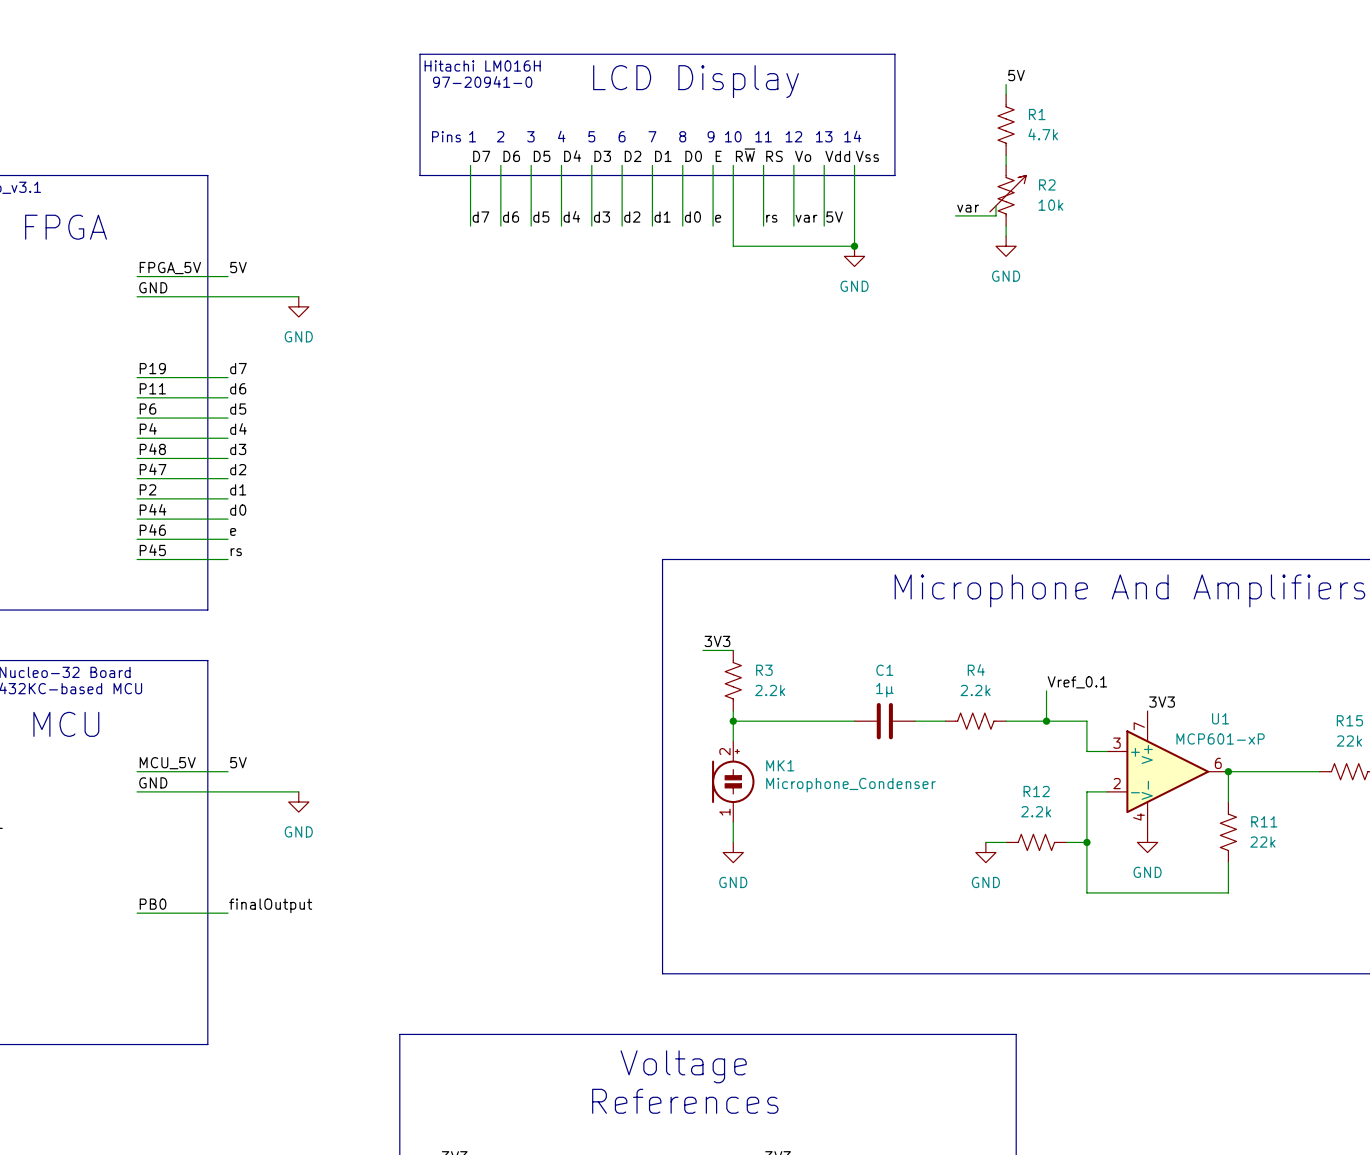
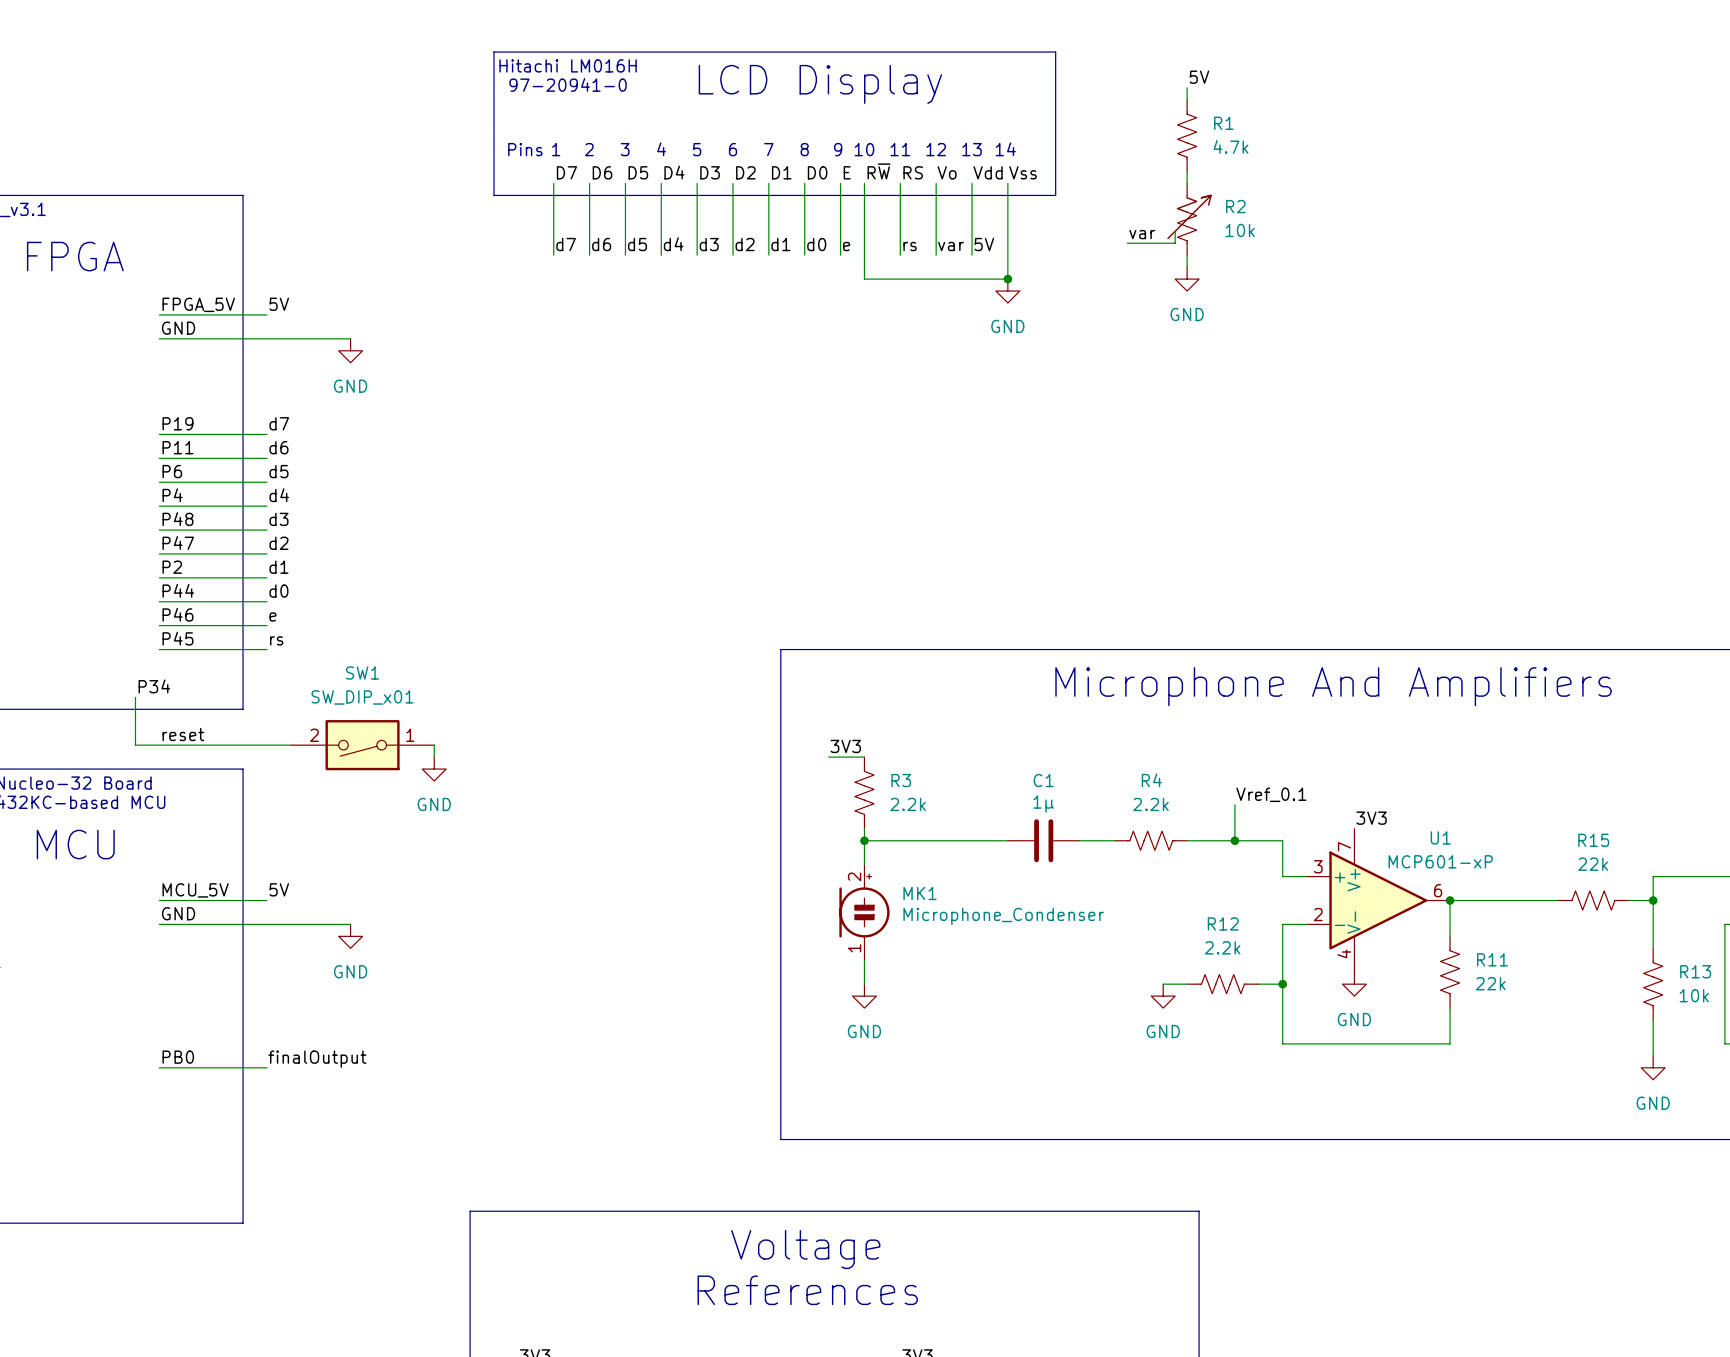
label: none -> P34 (154, 686)
wire: none -> (135, 697) (135, 745) (290, 745)
label: none -> reset (183, 734)
SW1: none -> SW_DIP_x01 (362, 745)
wire: none -> (434, 745) (434, 757)
power symbol: none -> GND (434, 769)

